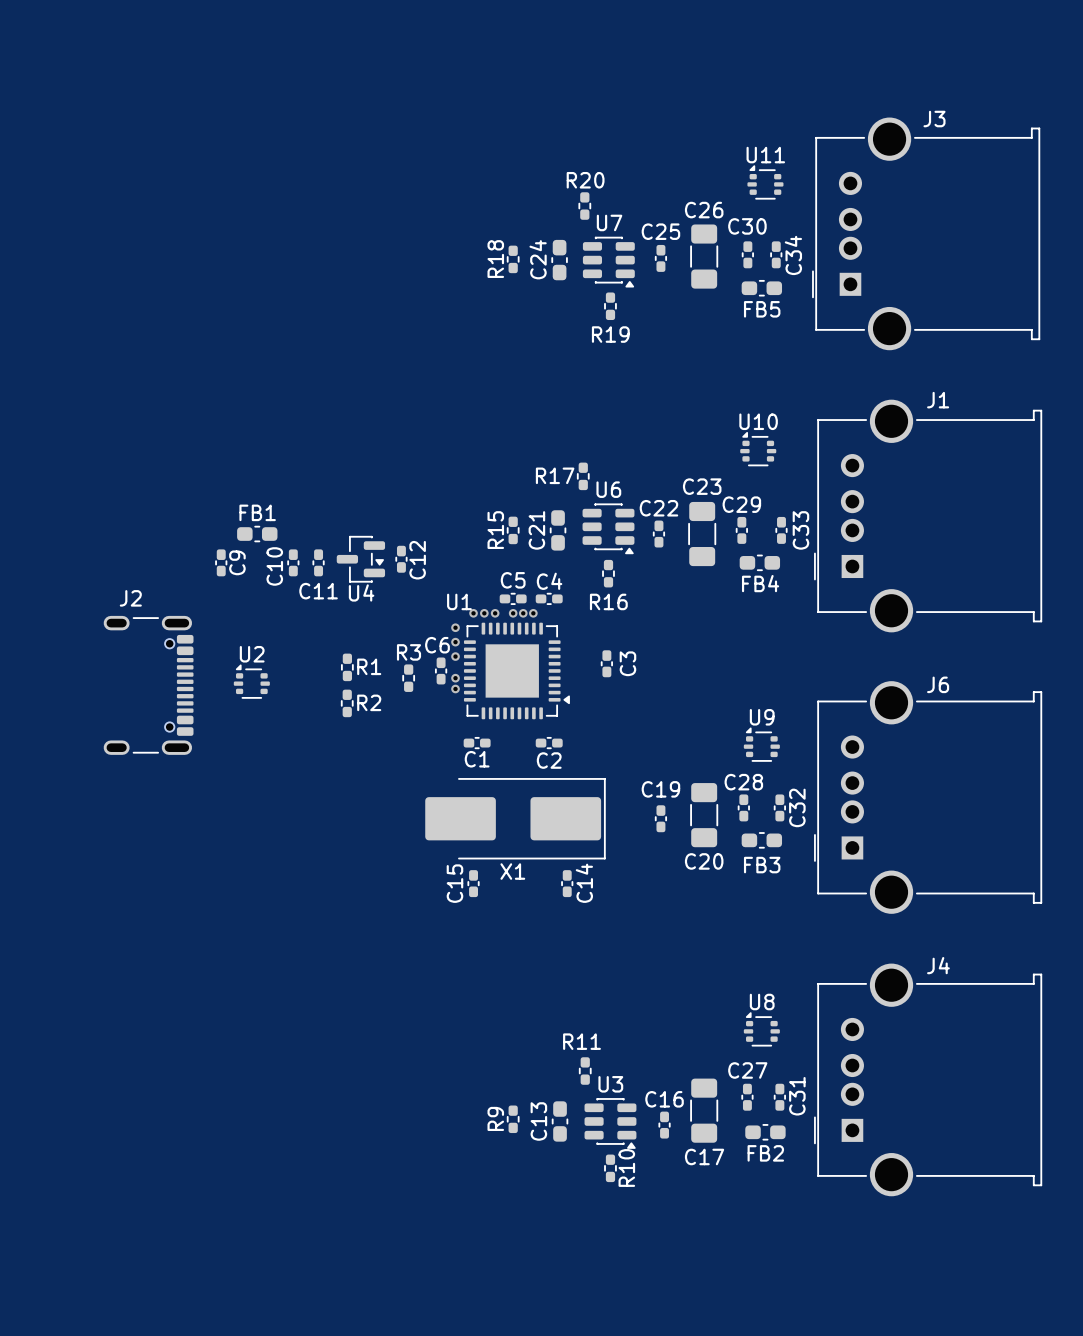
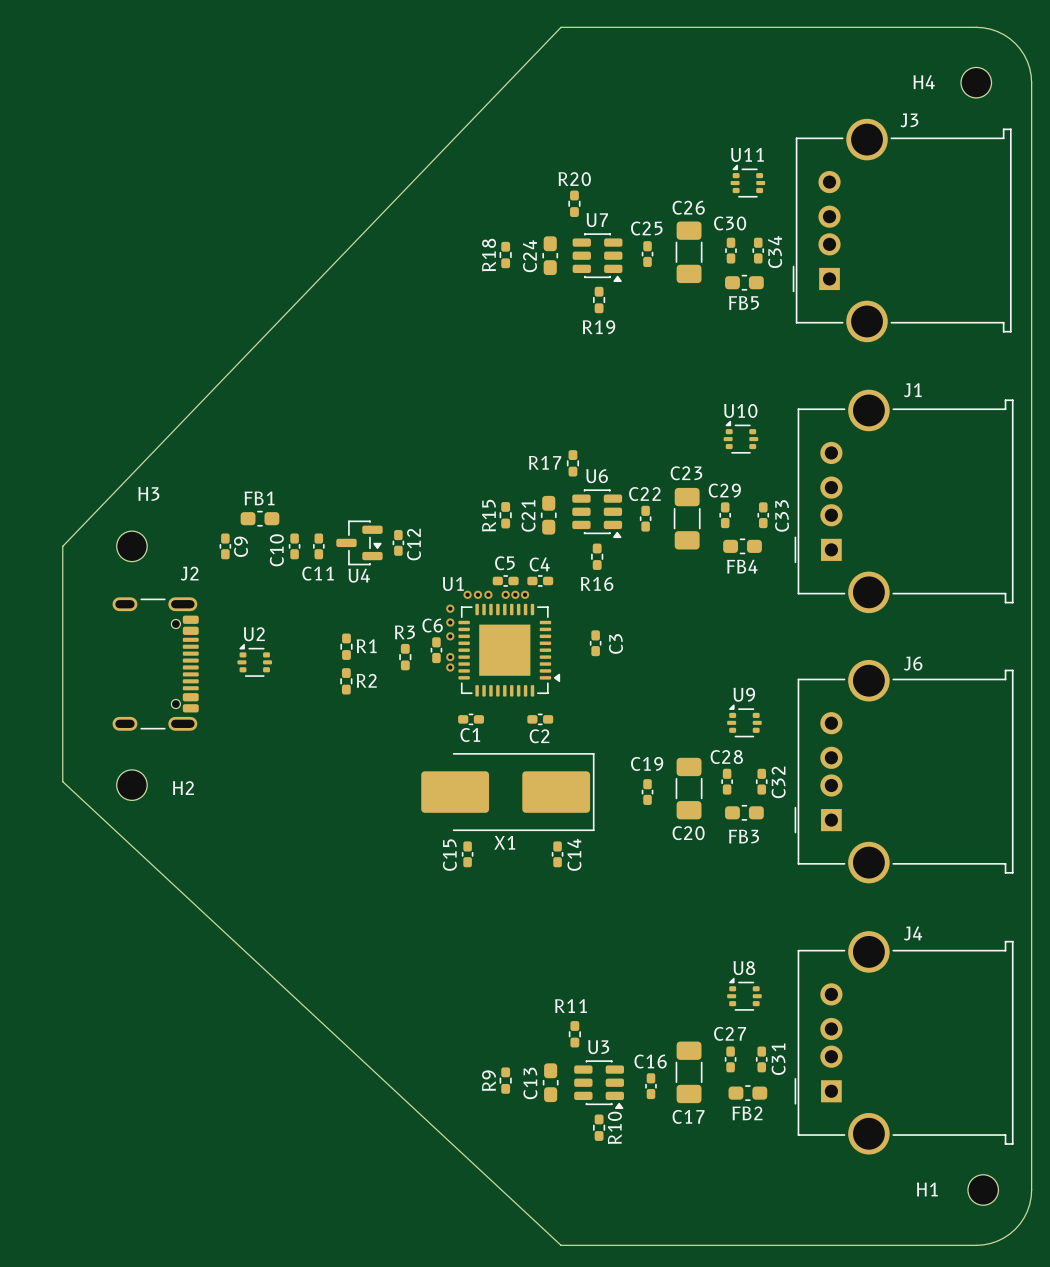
board edge: none -> (561, 27) (62, 546) (62, 781) (561, 1245) (976, 1245) (997, 1241) (1015, 1229) (1024, 1217) (1029, 1204) (1031, 1189) (1031, 82) (1027, 61) (1020, 48) (1009, 38) (997, 31) (983, 27) (561, 27)
H4: none -> (976, 82)
H3: none -> (131, 546)
J2 name position: J2 (130, 598) -> J2 (189, 573)
H2: none -> (131, 785)
H1: none -> (983, 1189)

